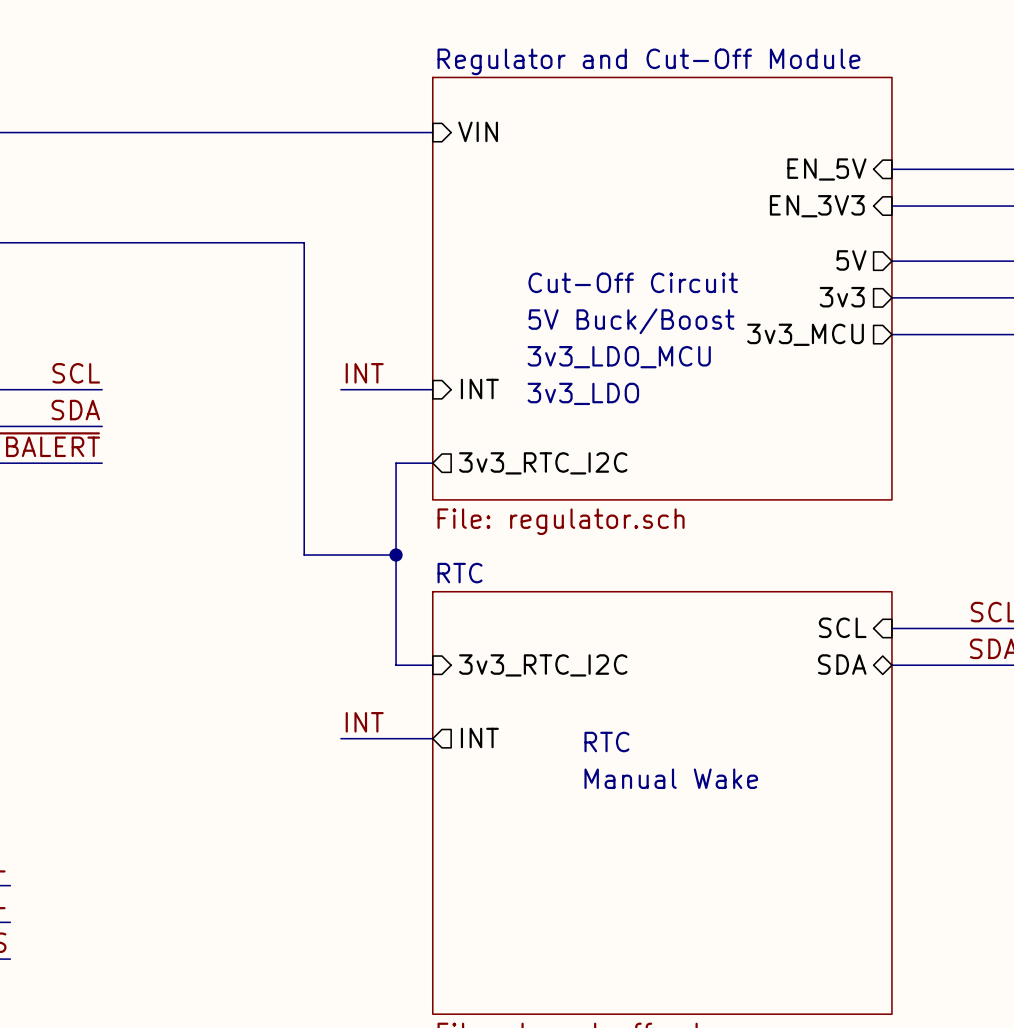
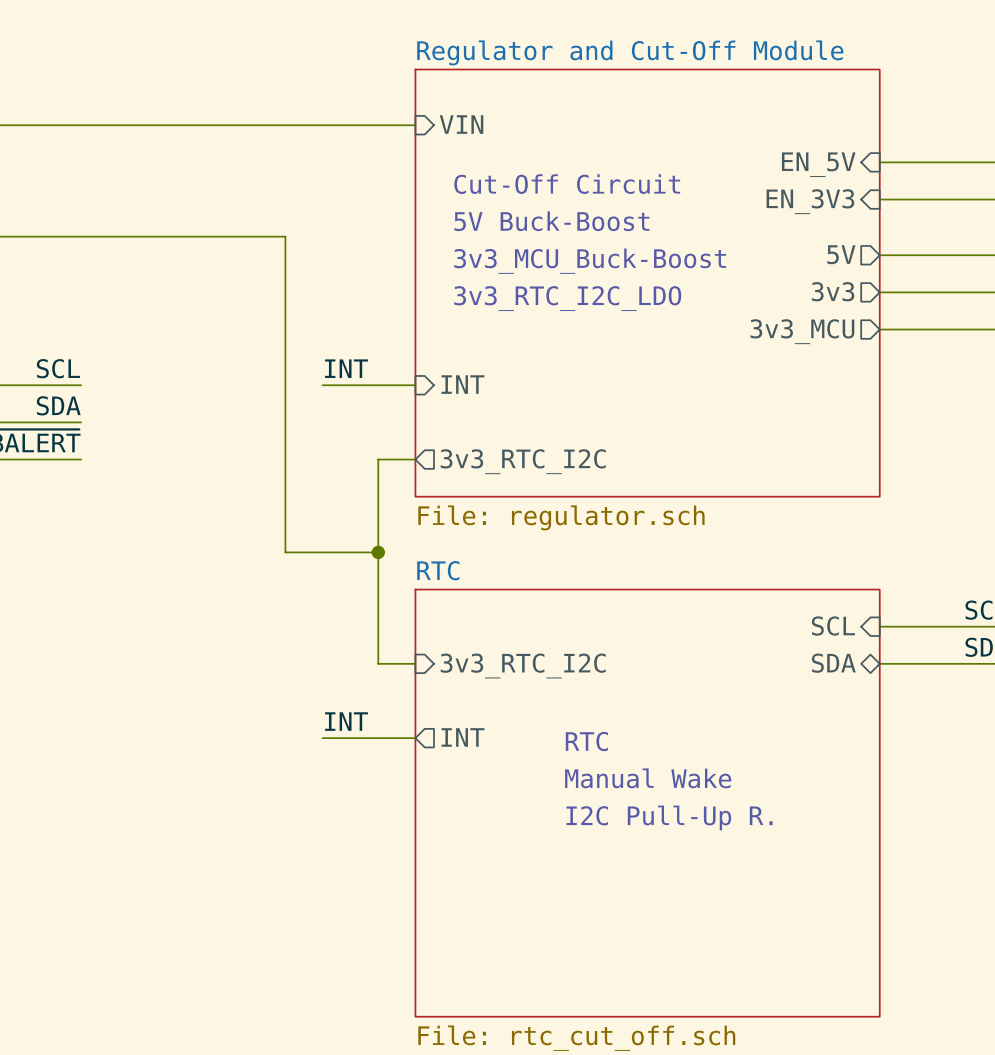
text: none -> 5V Buck-Boost (551, 221)
text: none -> 3v3_MCU_Buck-Boost (590, 261)
text position: Cut-Off Circuit (633, 282) -> Cut-Off Circuit (567, 184)
text: none -> 3v3_RTC_I2C_LDO (567, 298)
text: 5V Buck/Boost (631, 321) -> none
text: 3v3_LDO_MCU (619, 357) -> none
text: 3v3_LDO (583, 393) -> none
text: none -> I2C Pull-Up R. (669, 817)

